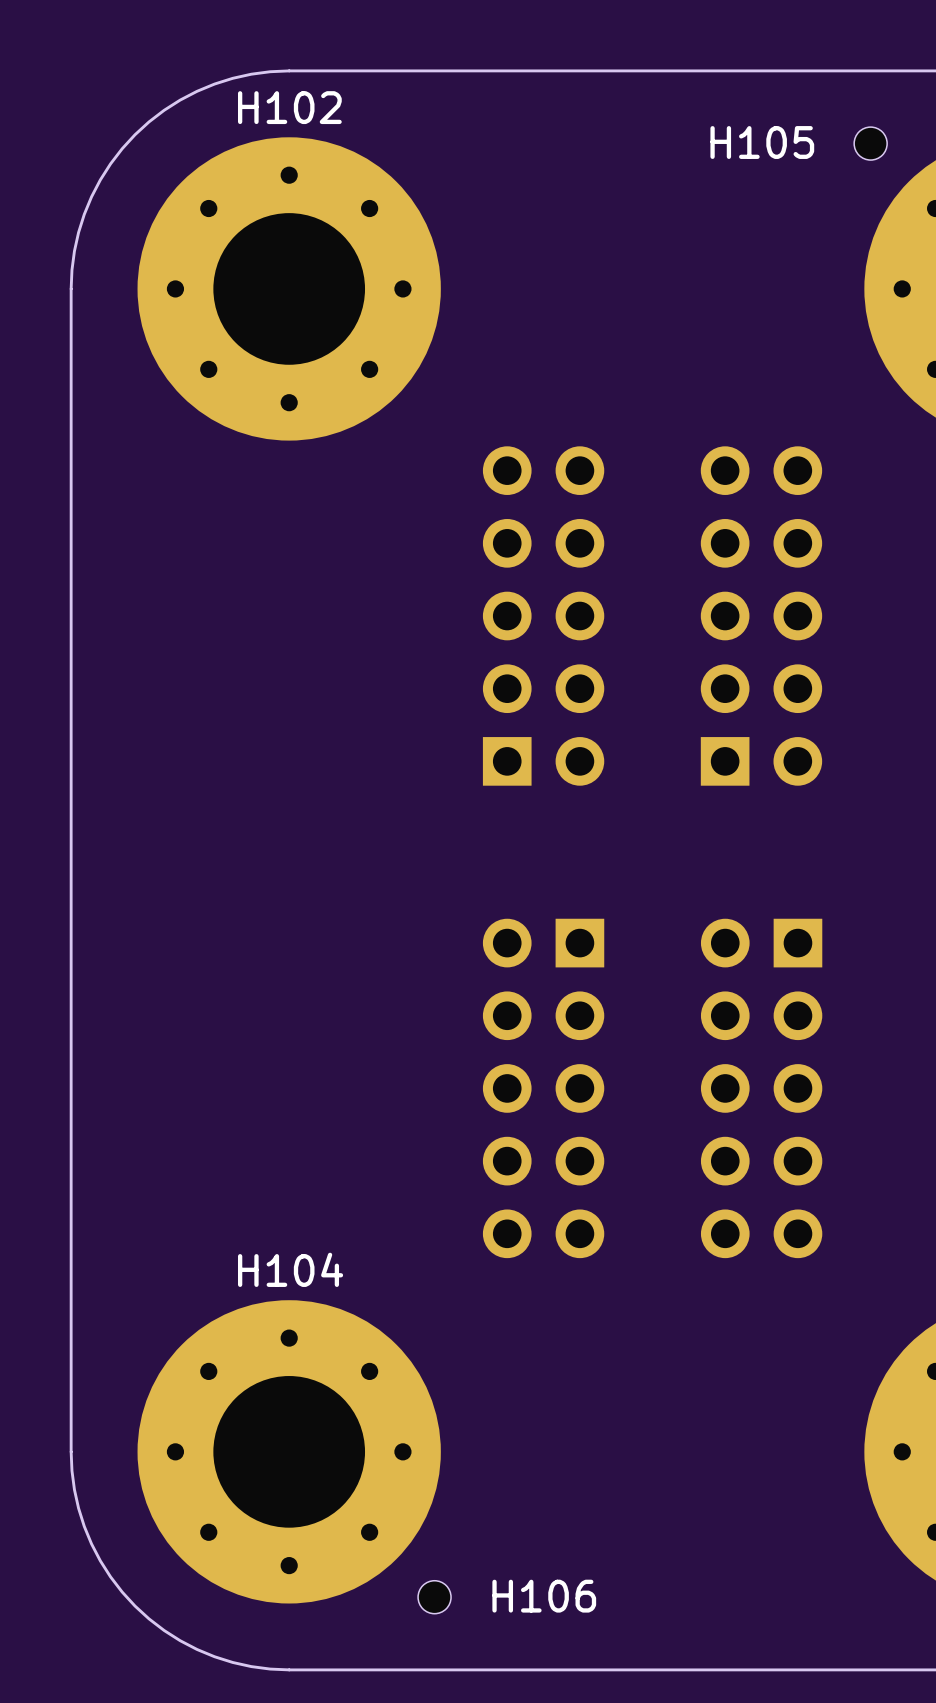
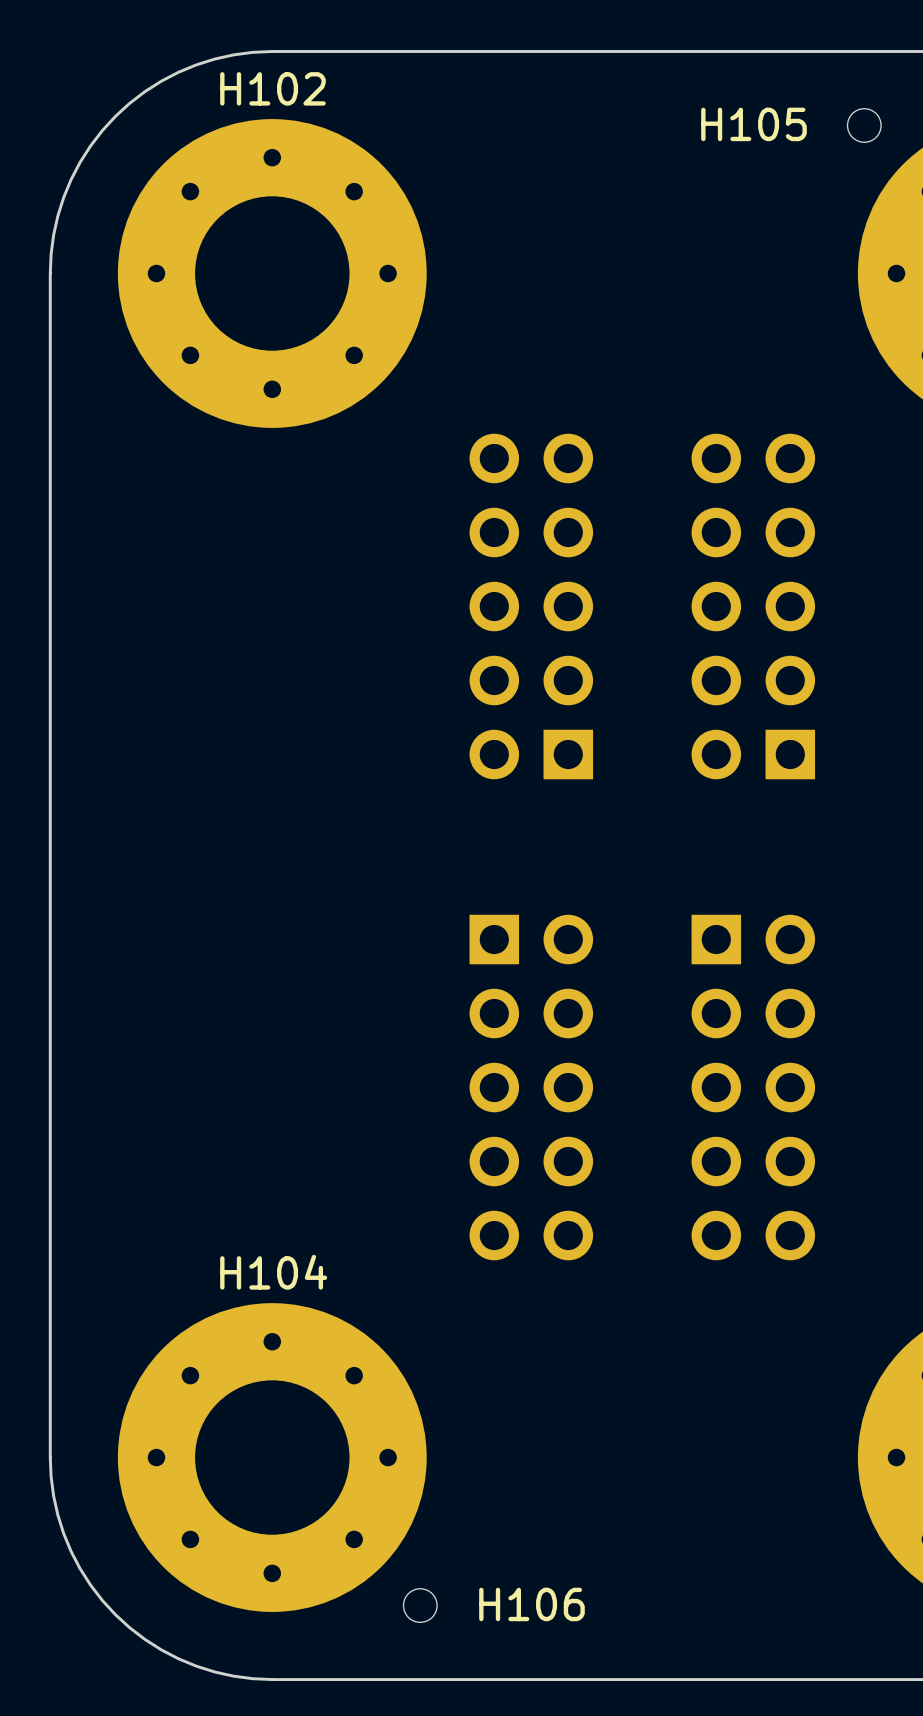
part footprint: [482, 446, 605, 786] -> [469, 433, 594, 780]
part footprint: [700, 446, 823, 786] -> [691, 433, 816, 780]
part footprint: [482, 918, 605, 1259] -> [469, 914, 594, 1261]
part footprint: [700, 918, 823, 1259] -> [691, 914, 816, 1261]

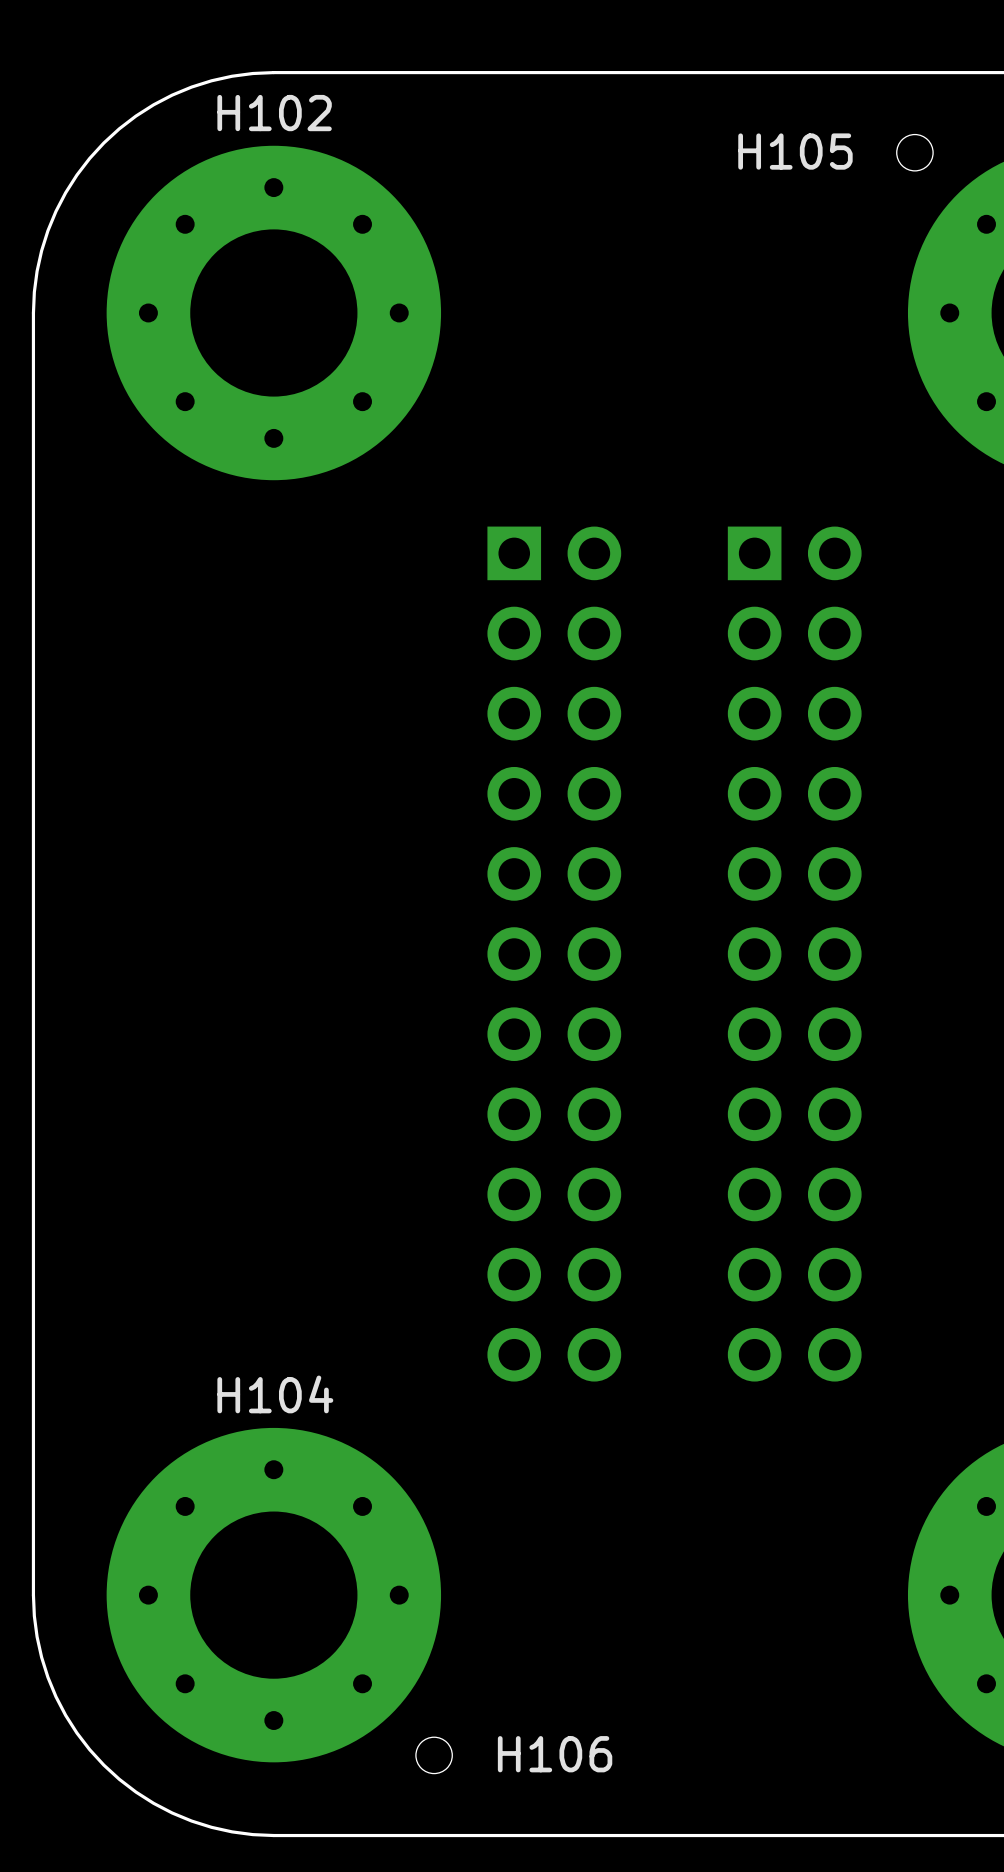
part: (531, 606) -> none
part: (753, 606) -> none
part: none -> (554, 954)
part: none -> (794, 954)
part: (531, 1087) -> none
part: (753, 1087) -> none

